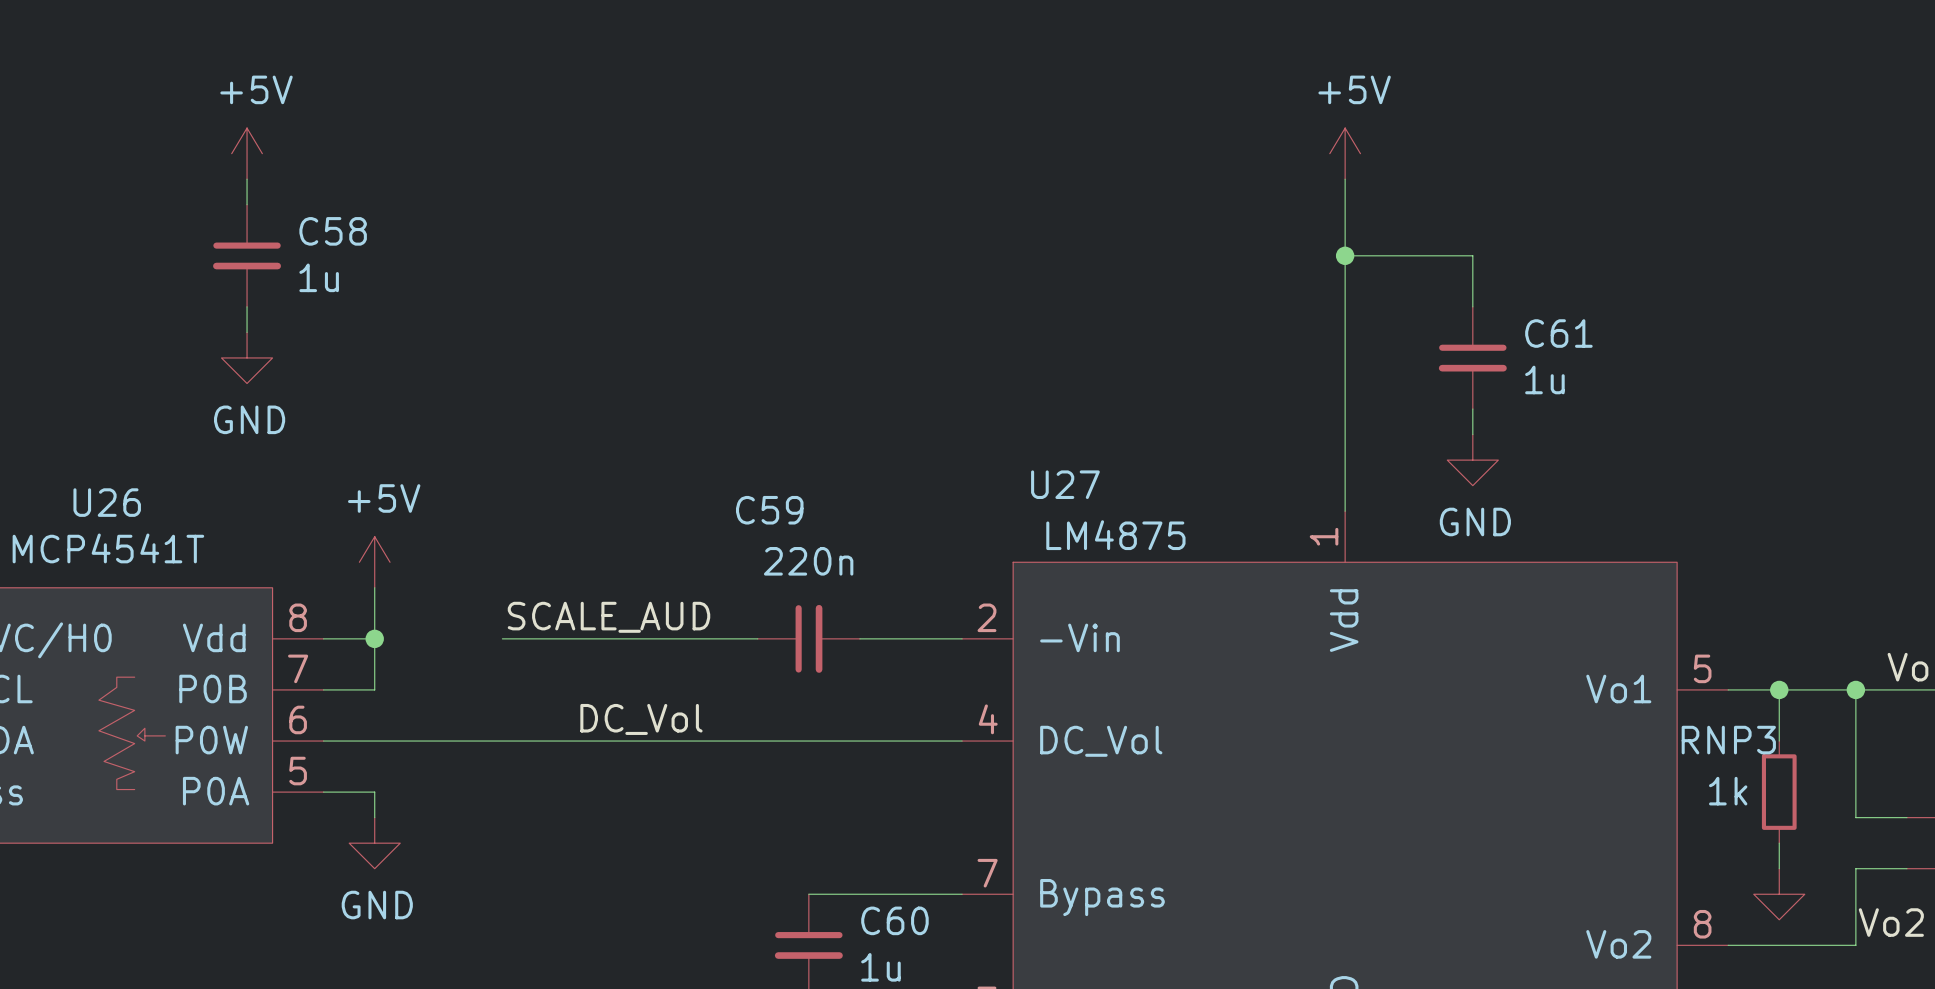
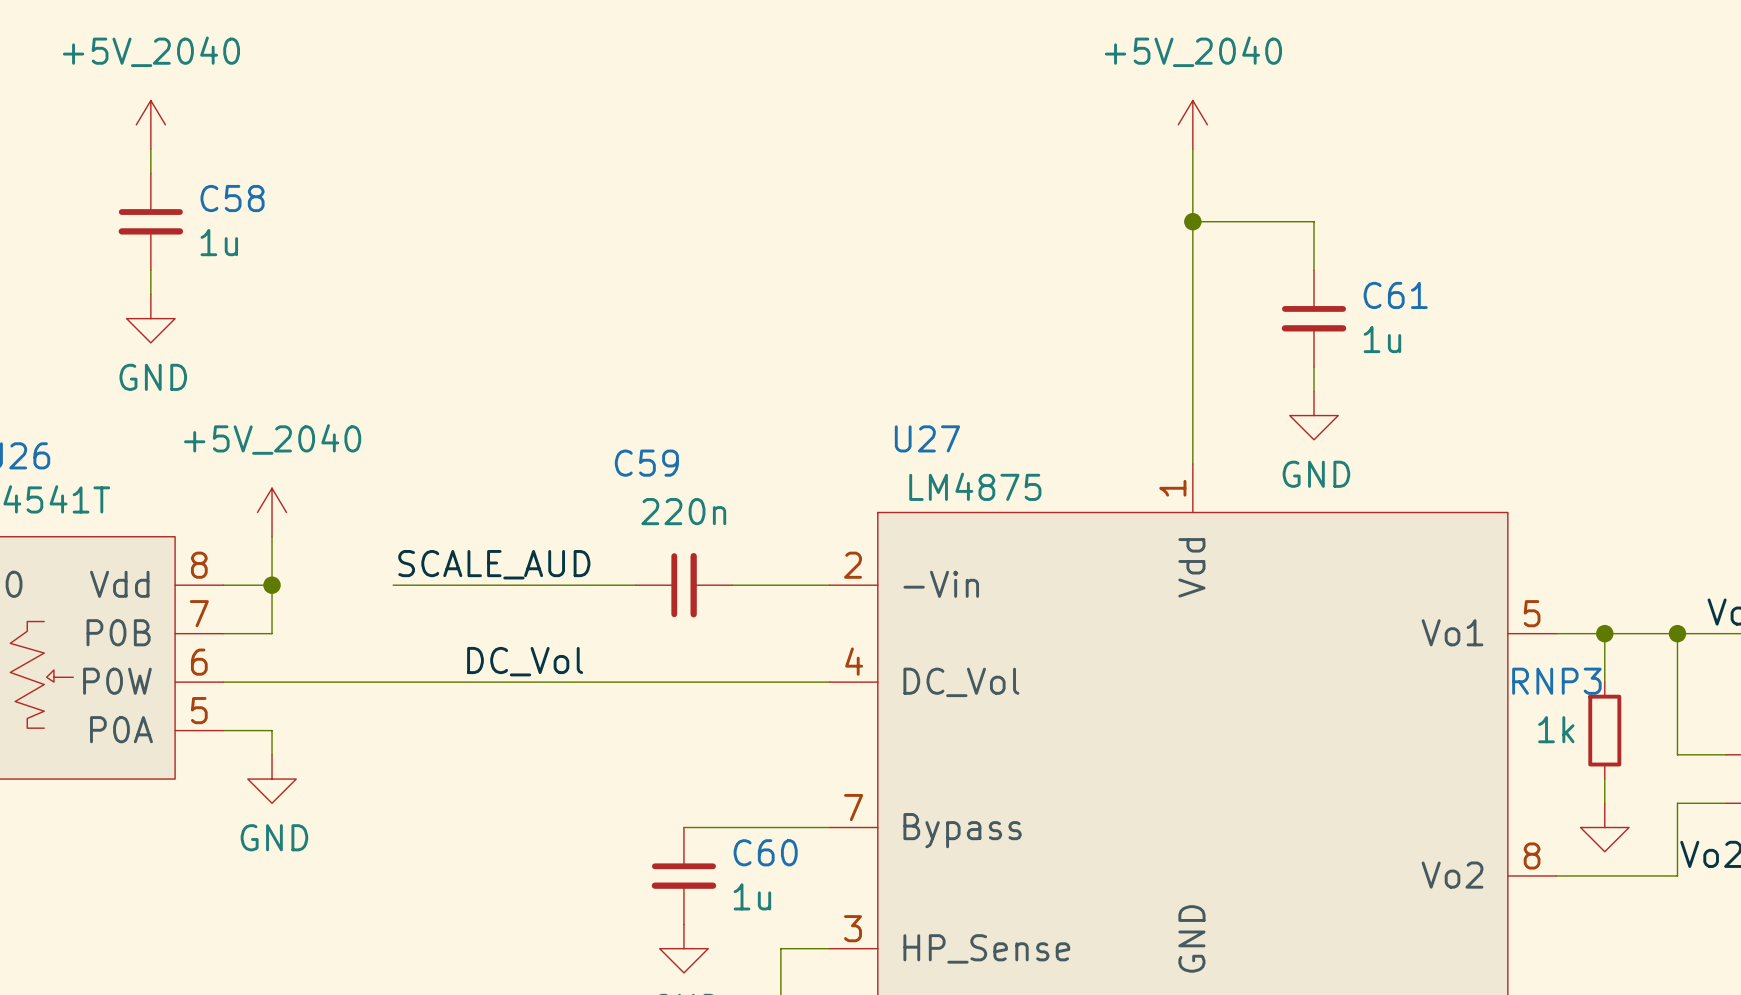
power symbol: +5V (247, 153) -> +5V_2040 (150, 124)
power symbol: +5V (1345, 153) -> +5V_2040 (1192, 124)
power symbol: +5V (374, 562) -> +5V_2040 (272, 512)

